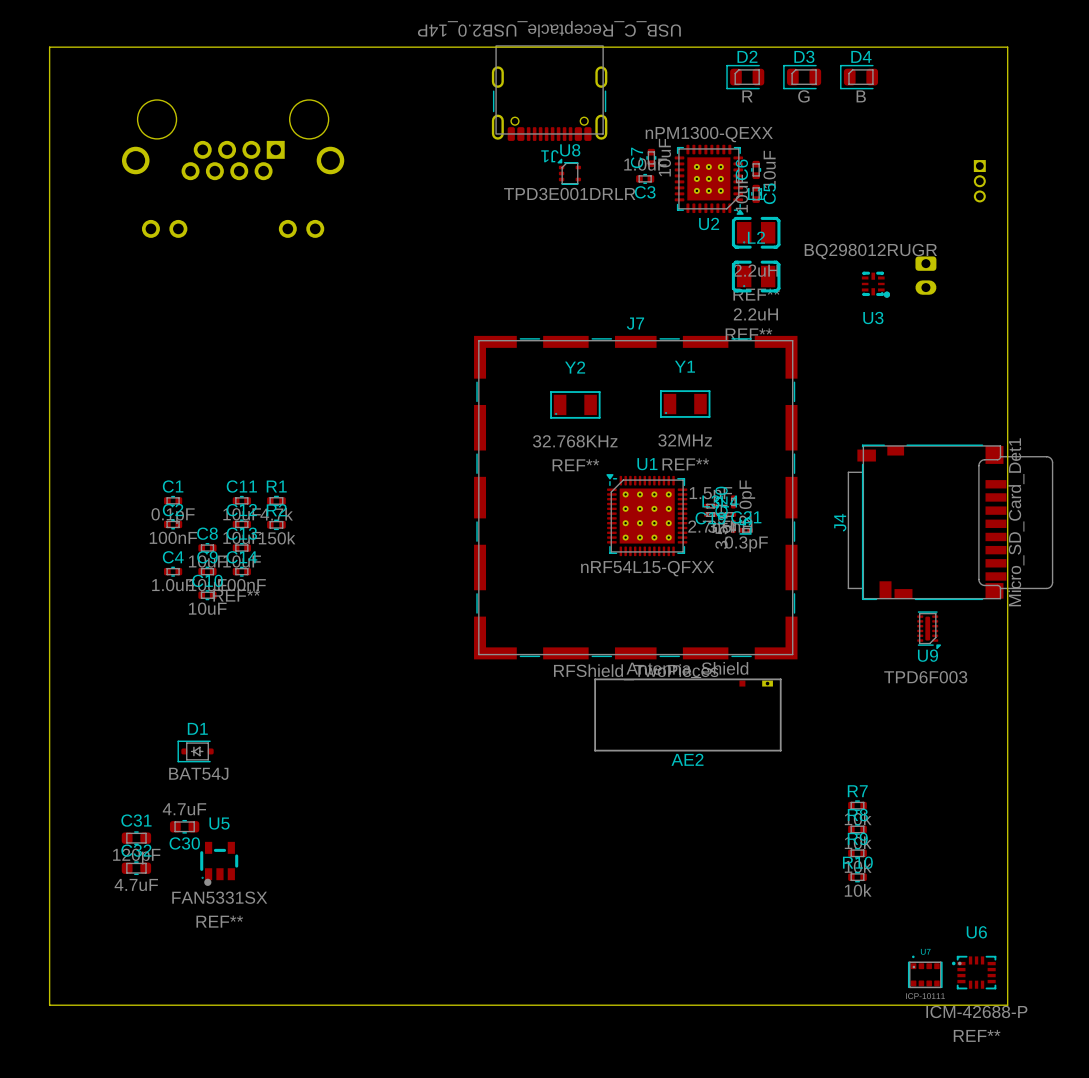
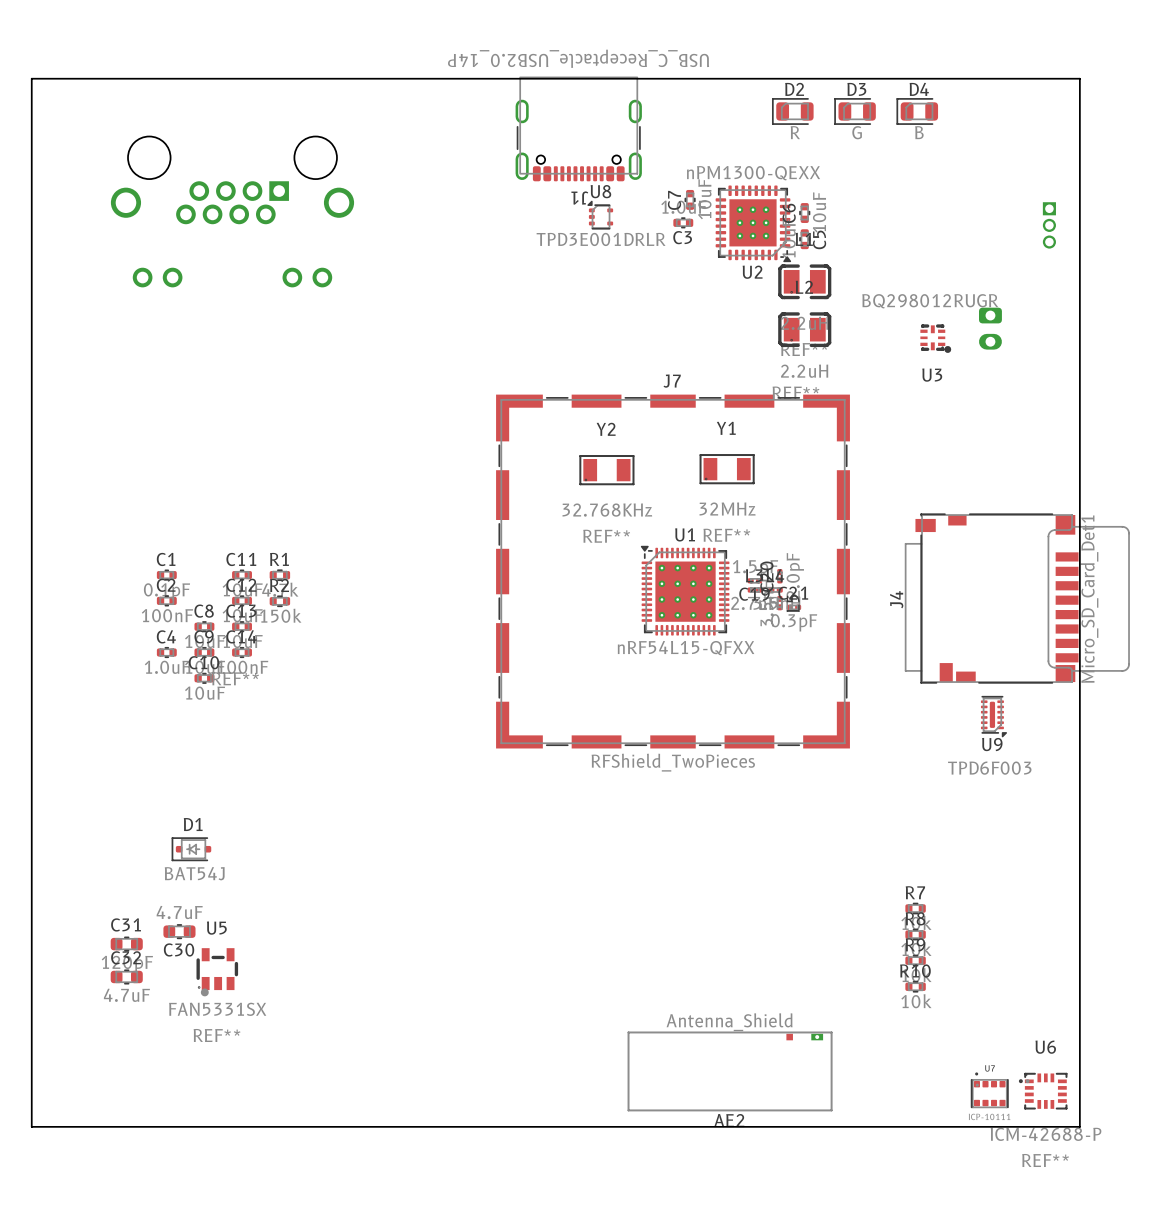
AE2 position: (687, 714) -> (730, 1071)

